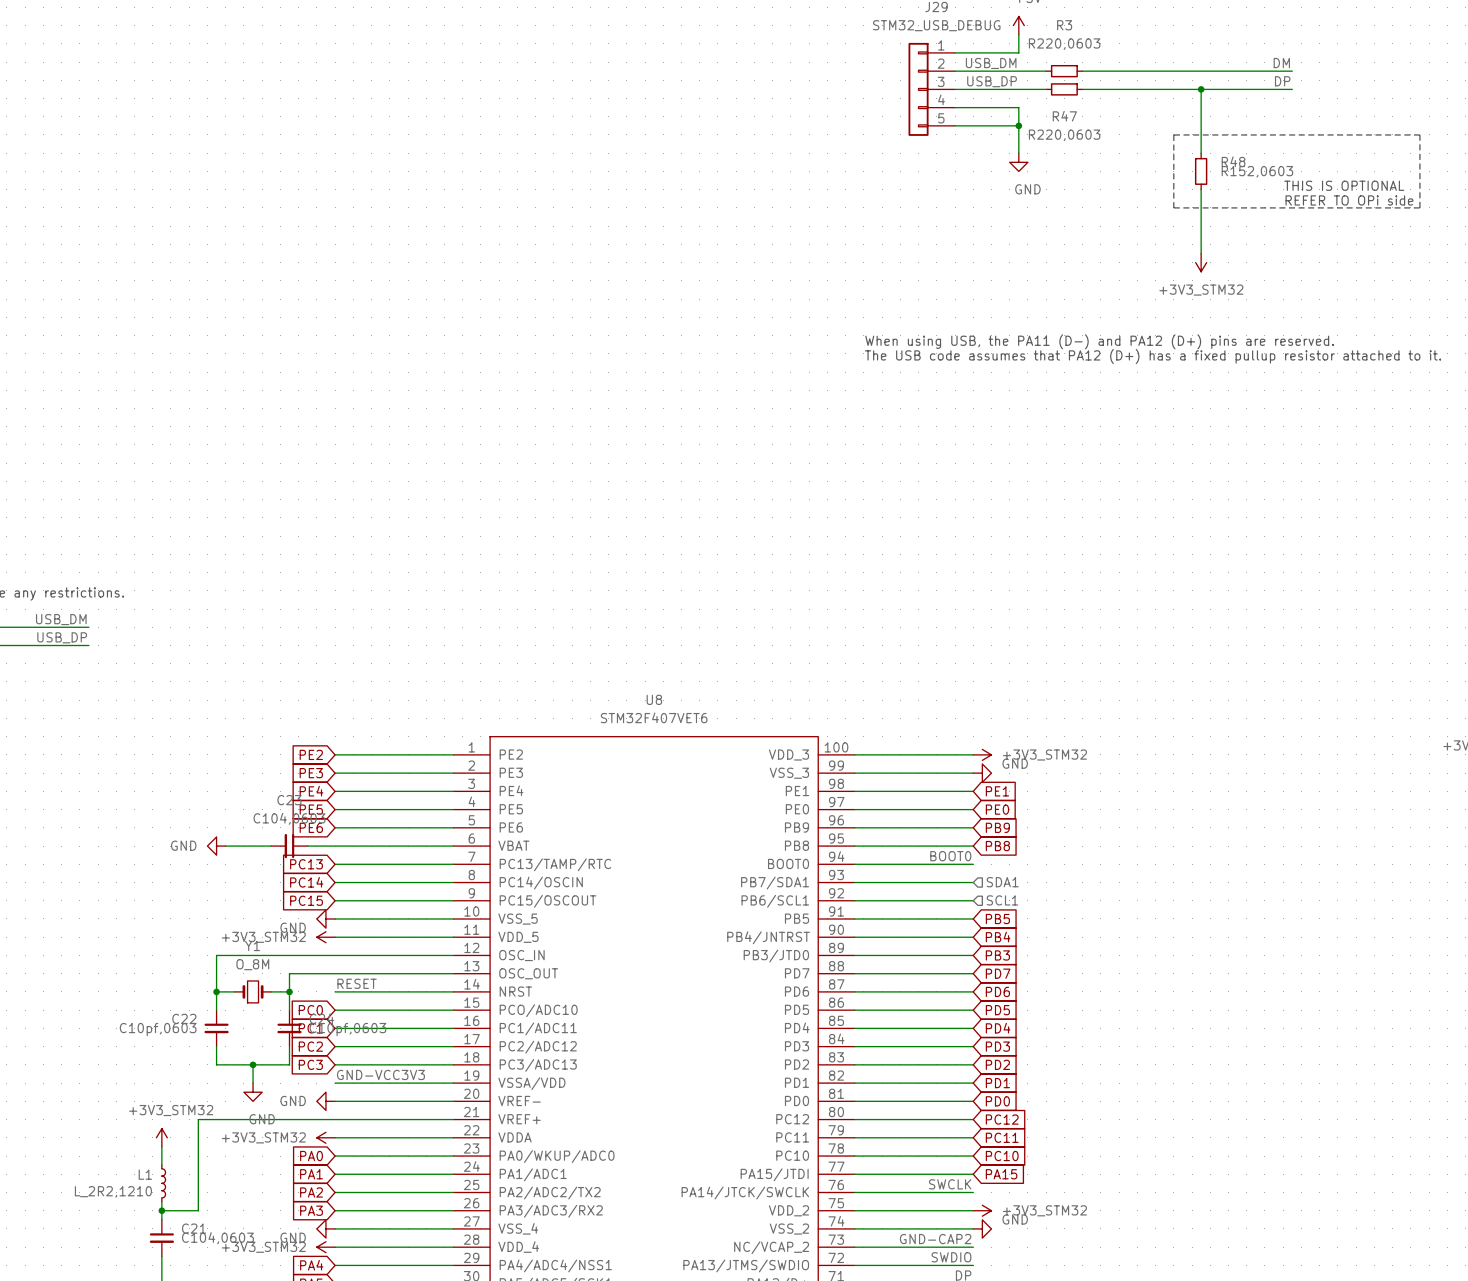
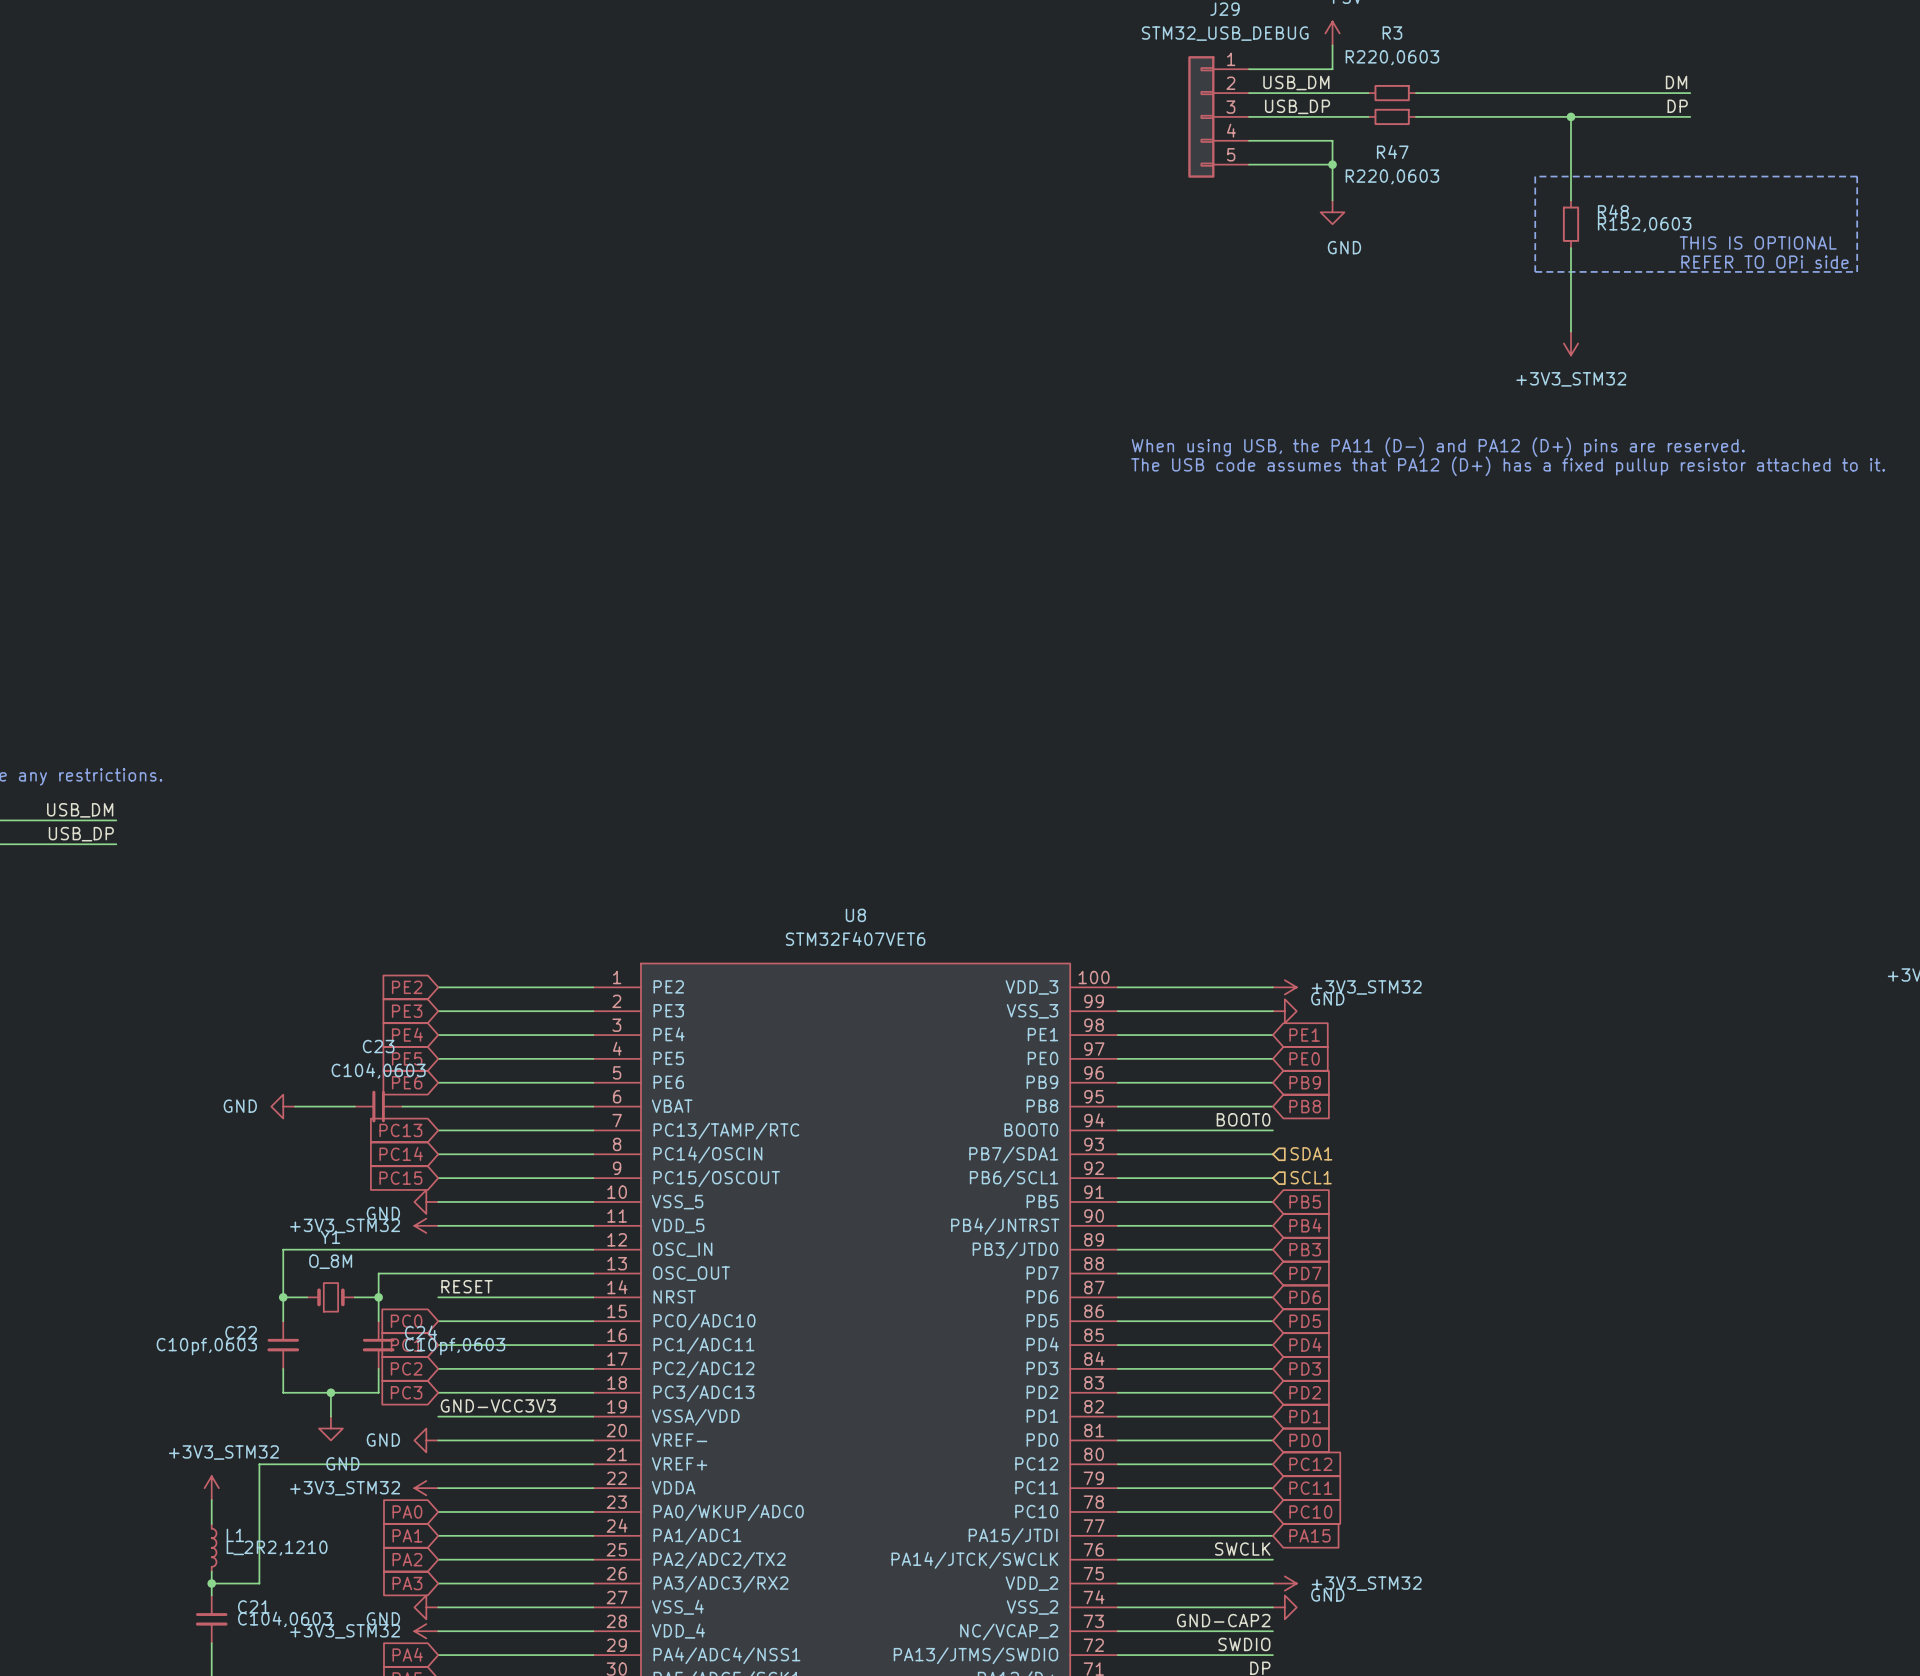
L1 name position: L1 (145, 1174) -> L1 (235, 1535)
L1 value position: L_2R2,1210 (113, 1191) -> L_2R2,1210 (277, 1548)

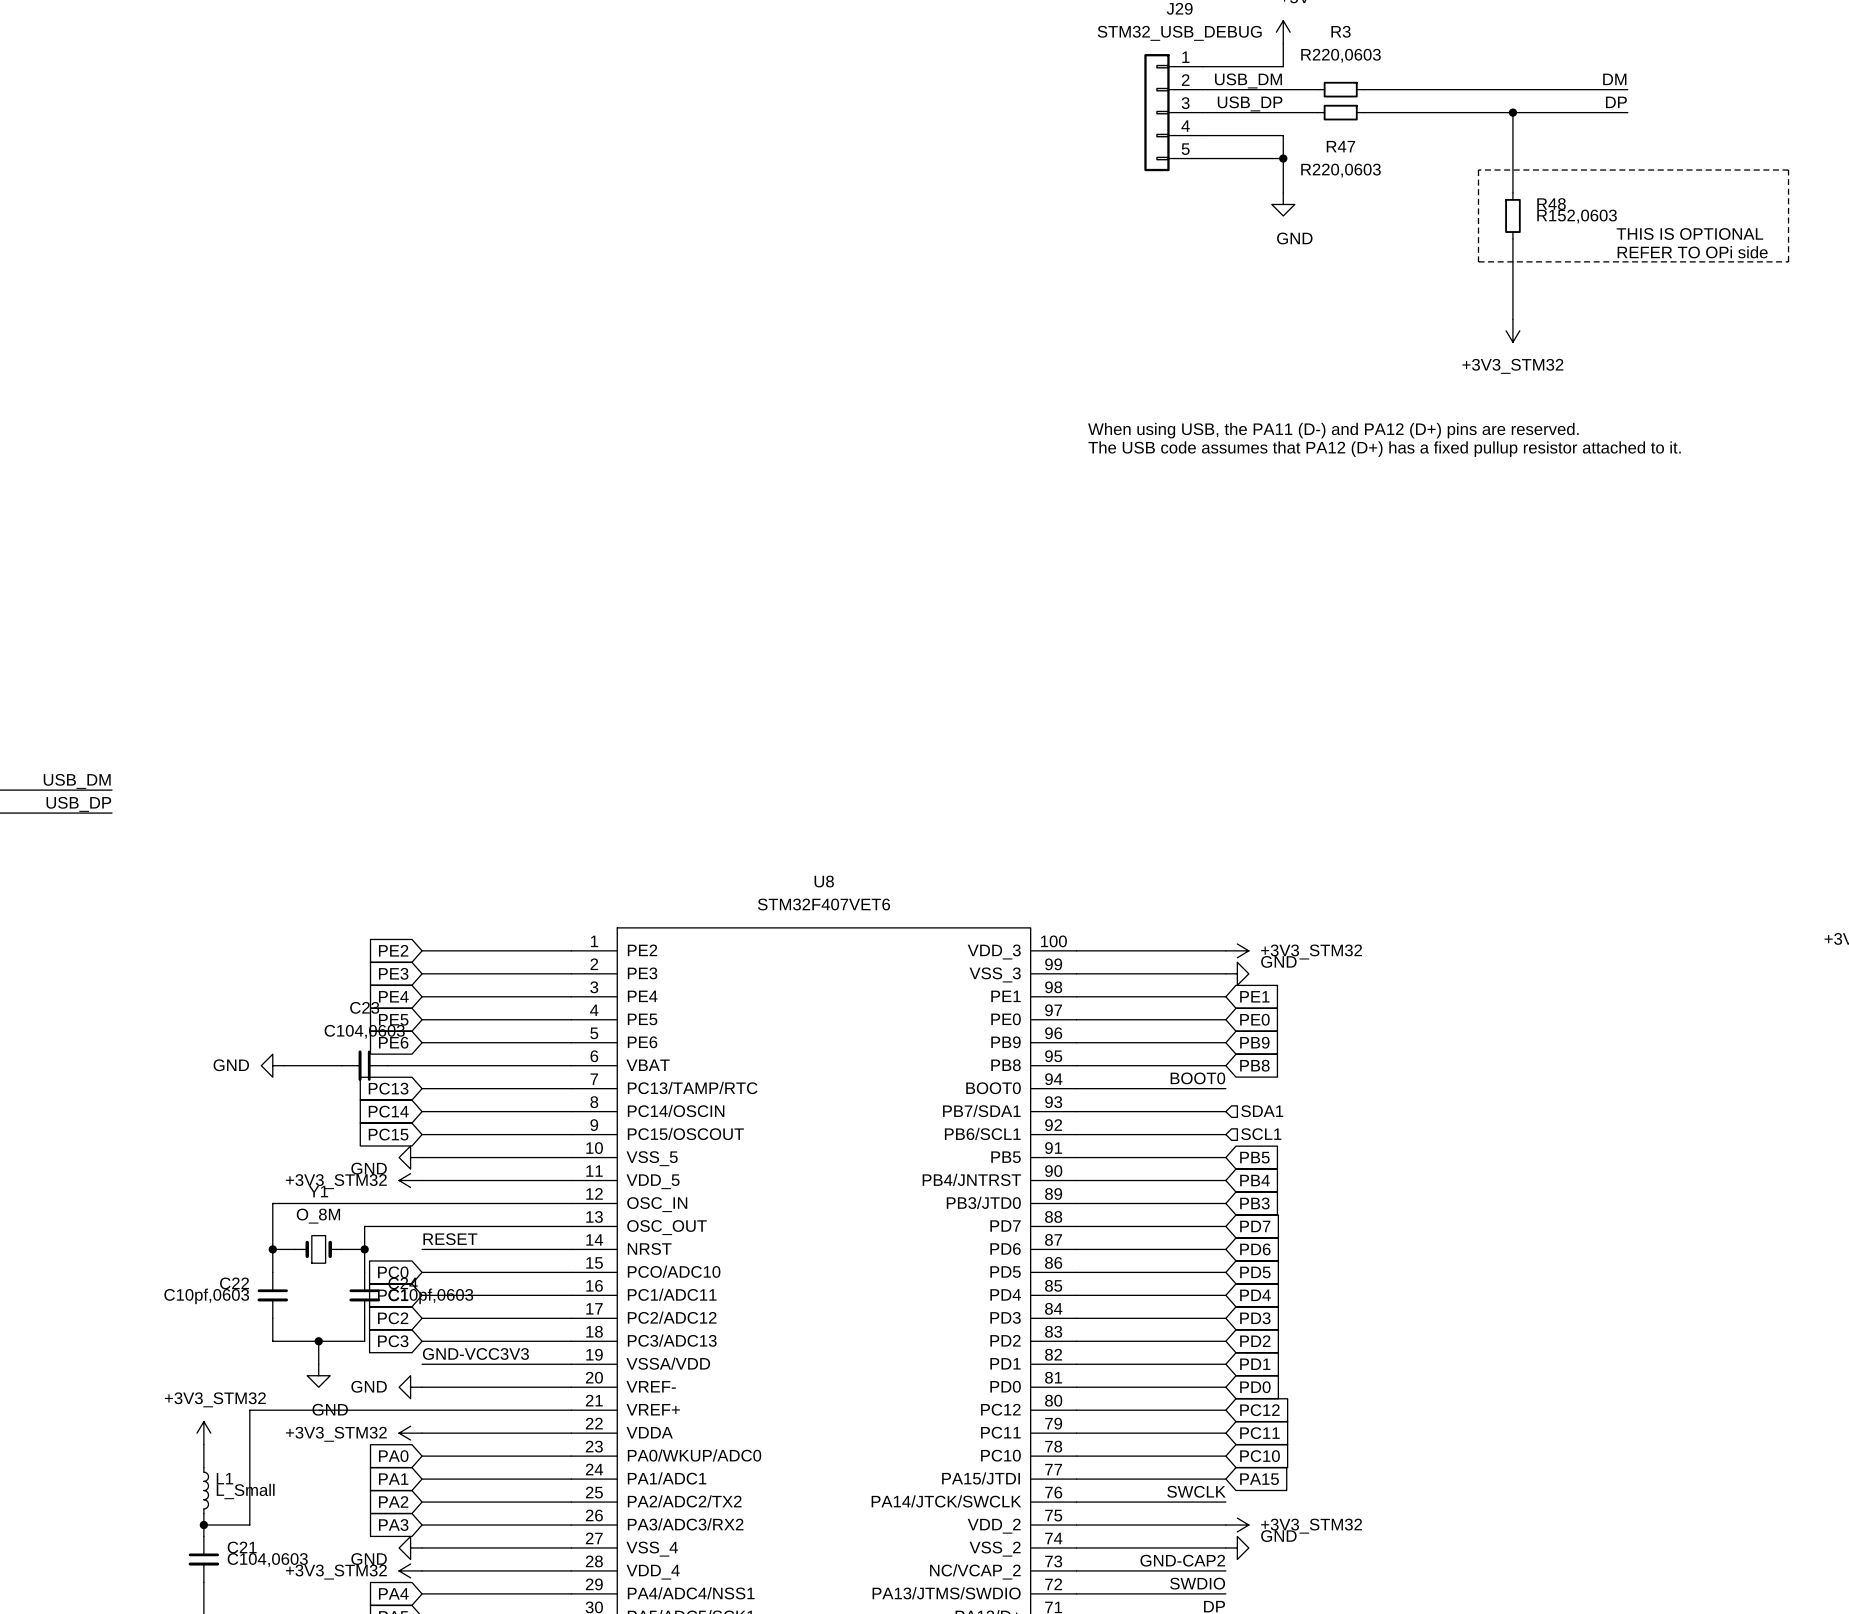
L1 value: L_2R2,1210 (277, 1548) -> L_Small (245, 1491)

